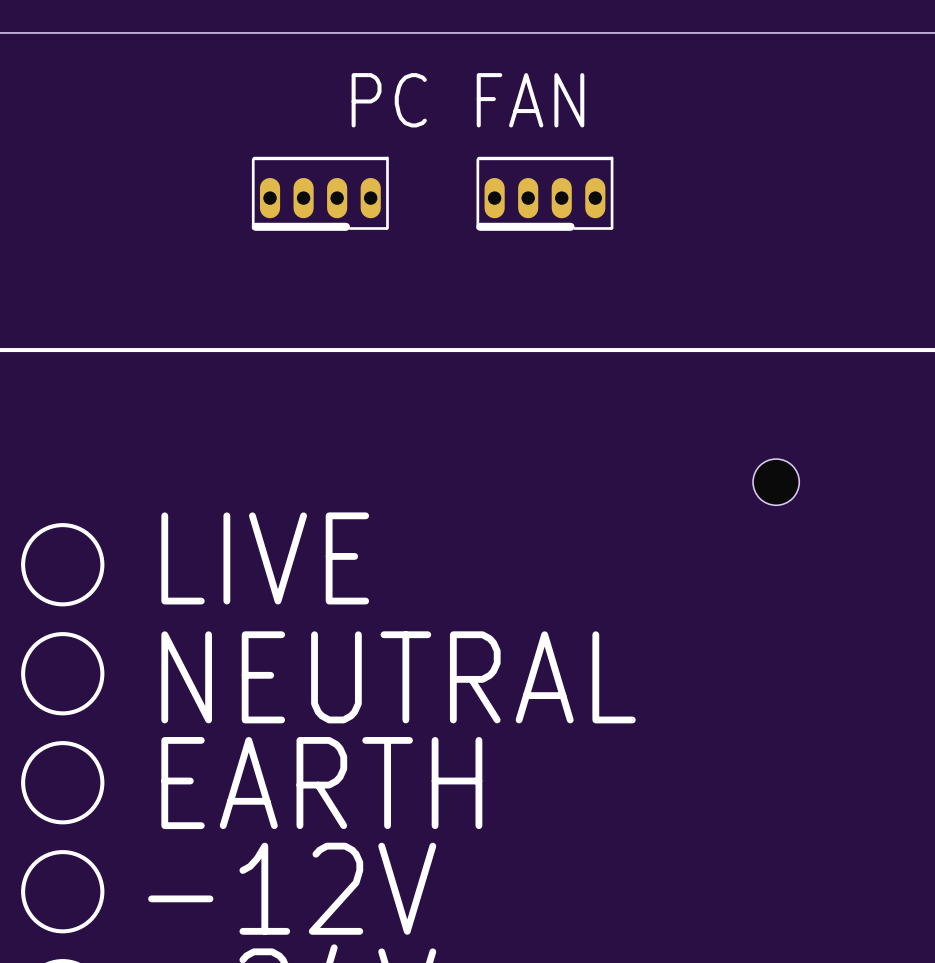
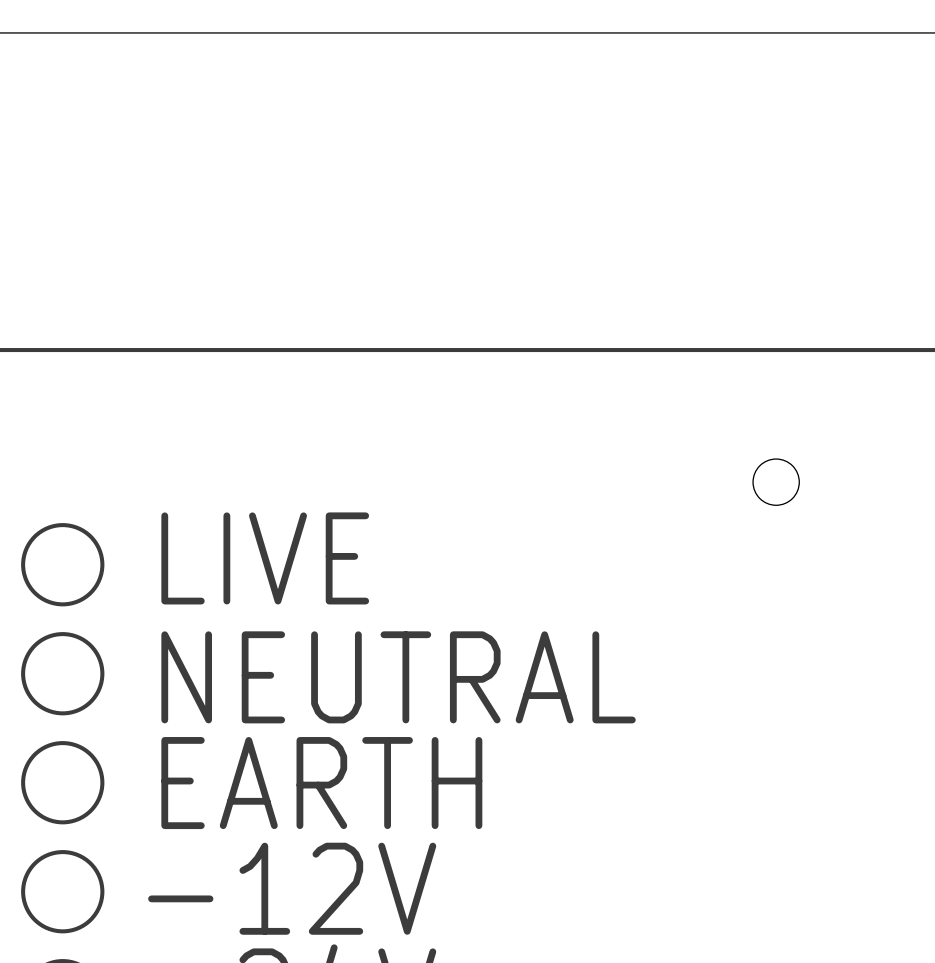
text: PC FAN (467, 100) -> none
part: (320, 193) -> none
part: (544, 193) -> none

